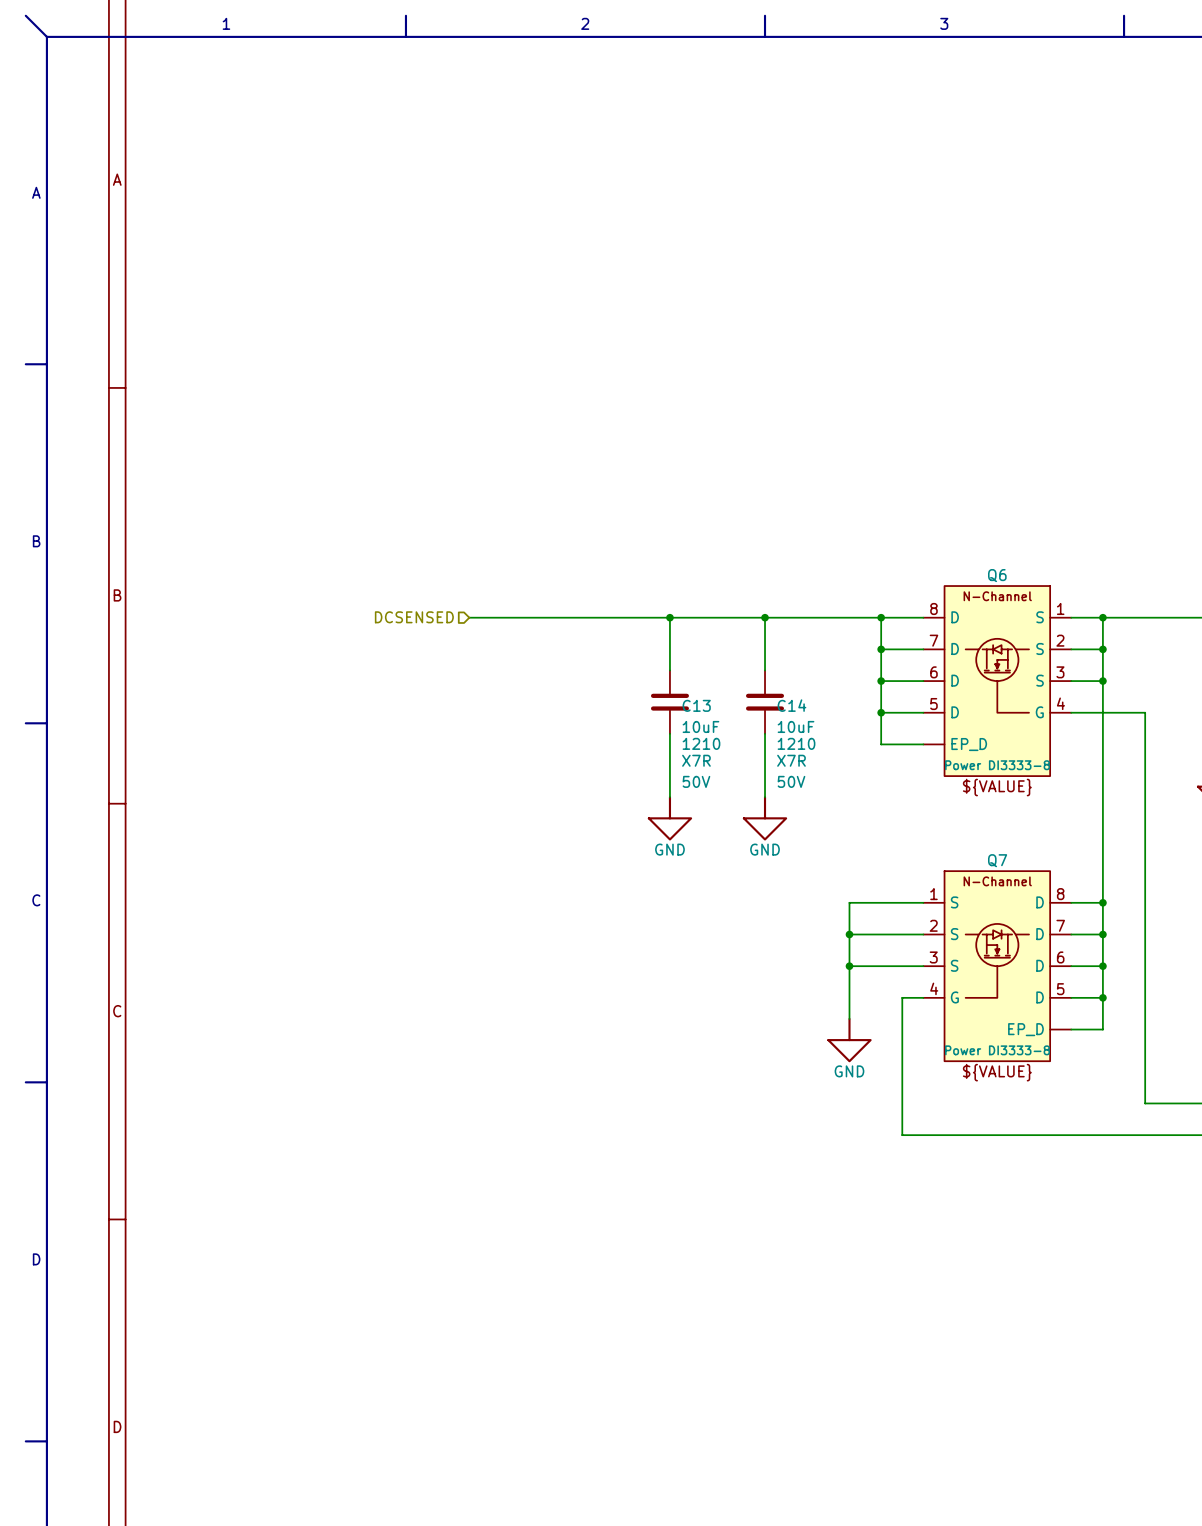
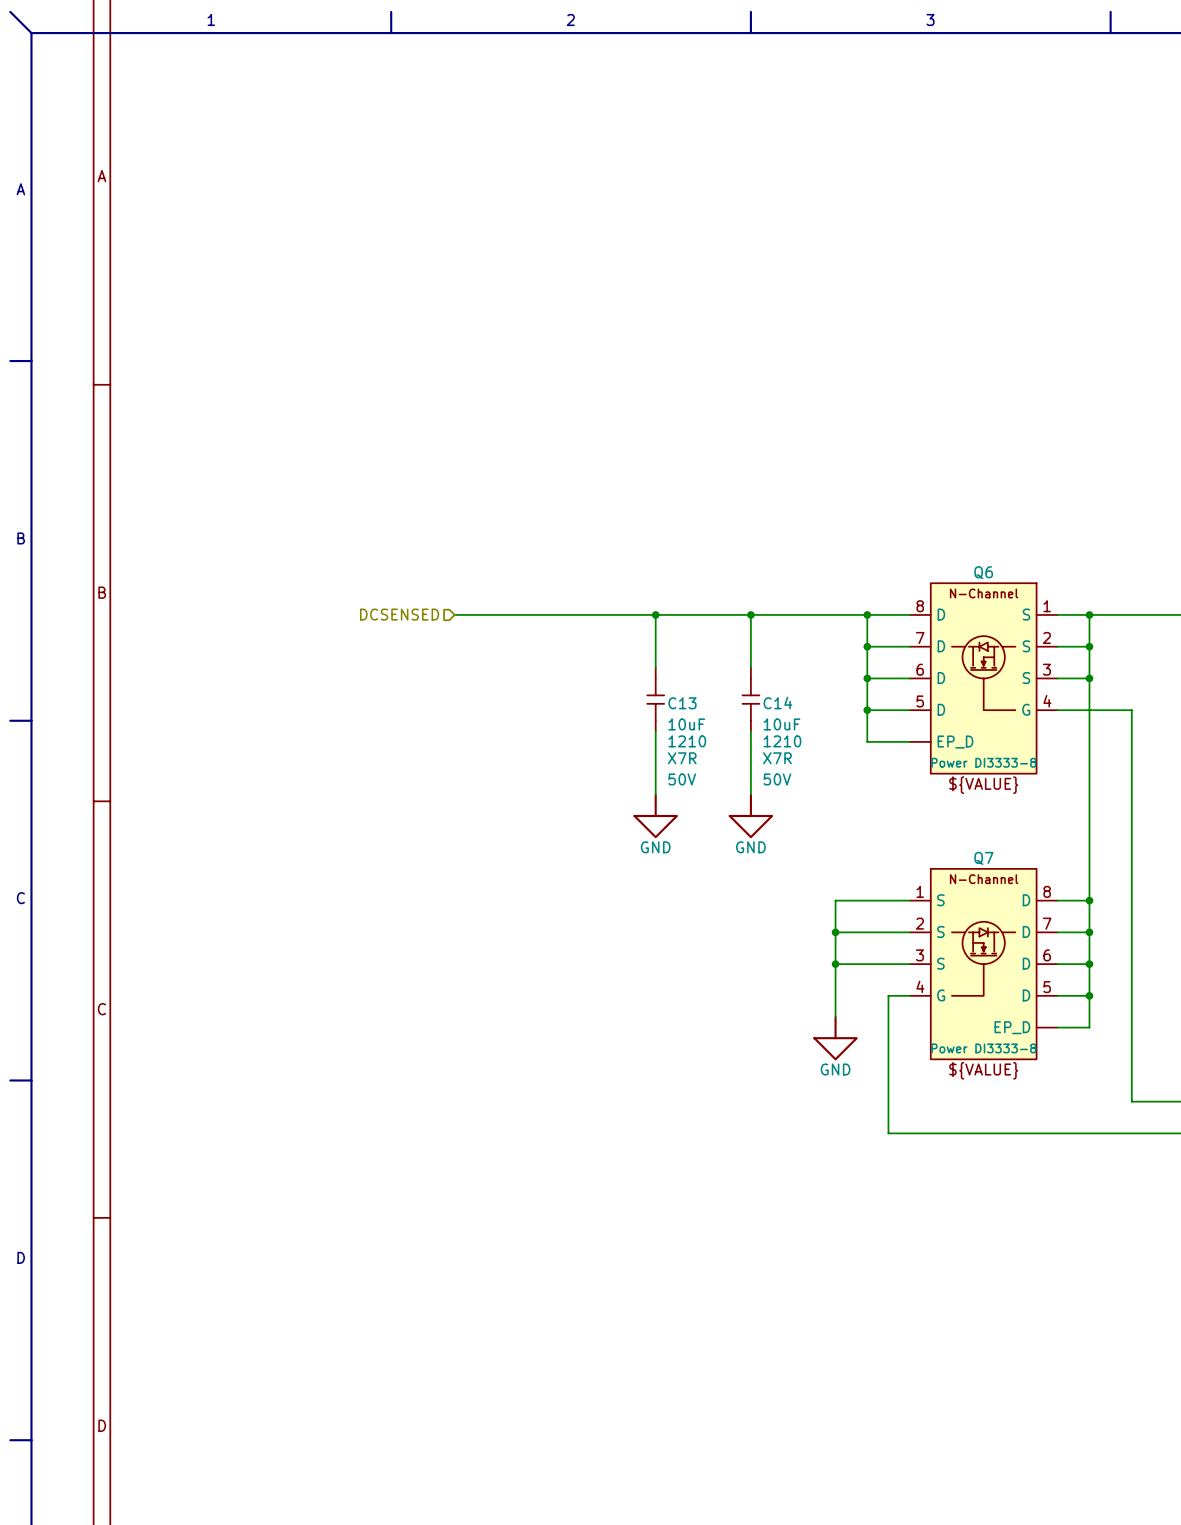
C13 symbol: [650, 670, 689, 734] -> [647, 667, 665, 732]
C14 symbol: [746, 670, 785, 734] -> [742, 667, 760, 732]

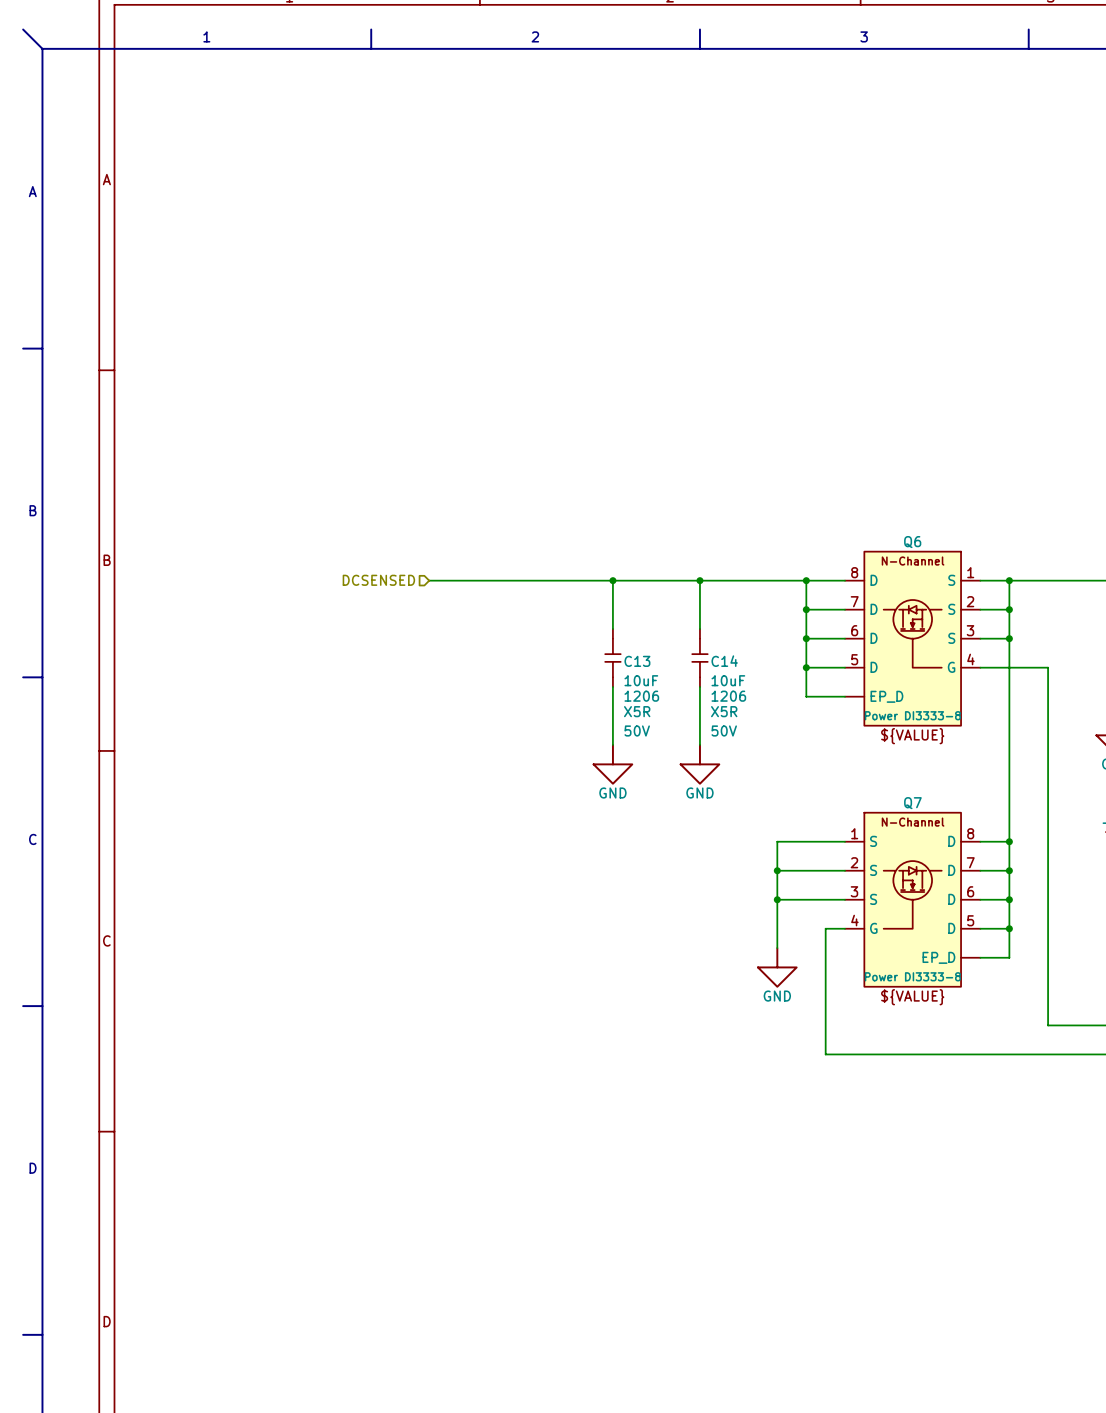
C13 text: 1210 (687, 741) -> 1206 (641, 696)
C14 text: 1210 (782, 741) -> 1206 (728, 696)
C13 text: X7R (682, 758) -> X5R (637, 711)
C14 text: X7R (777, 758) -> X5R (724, 711)

